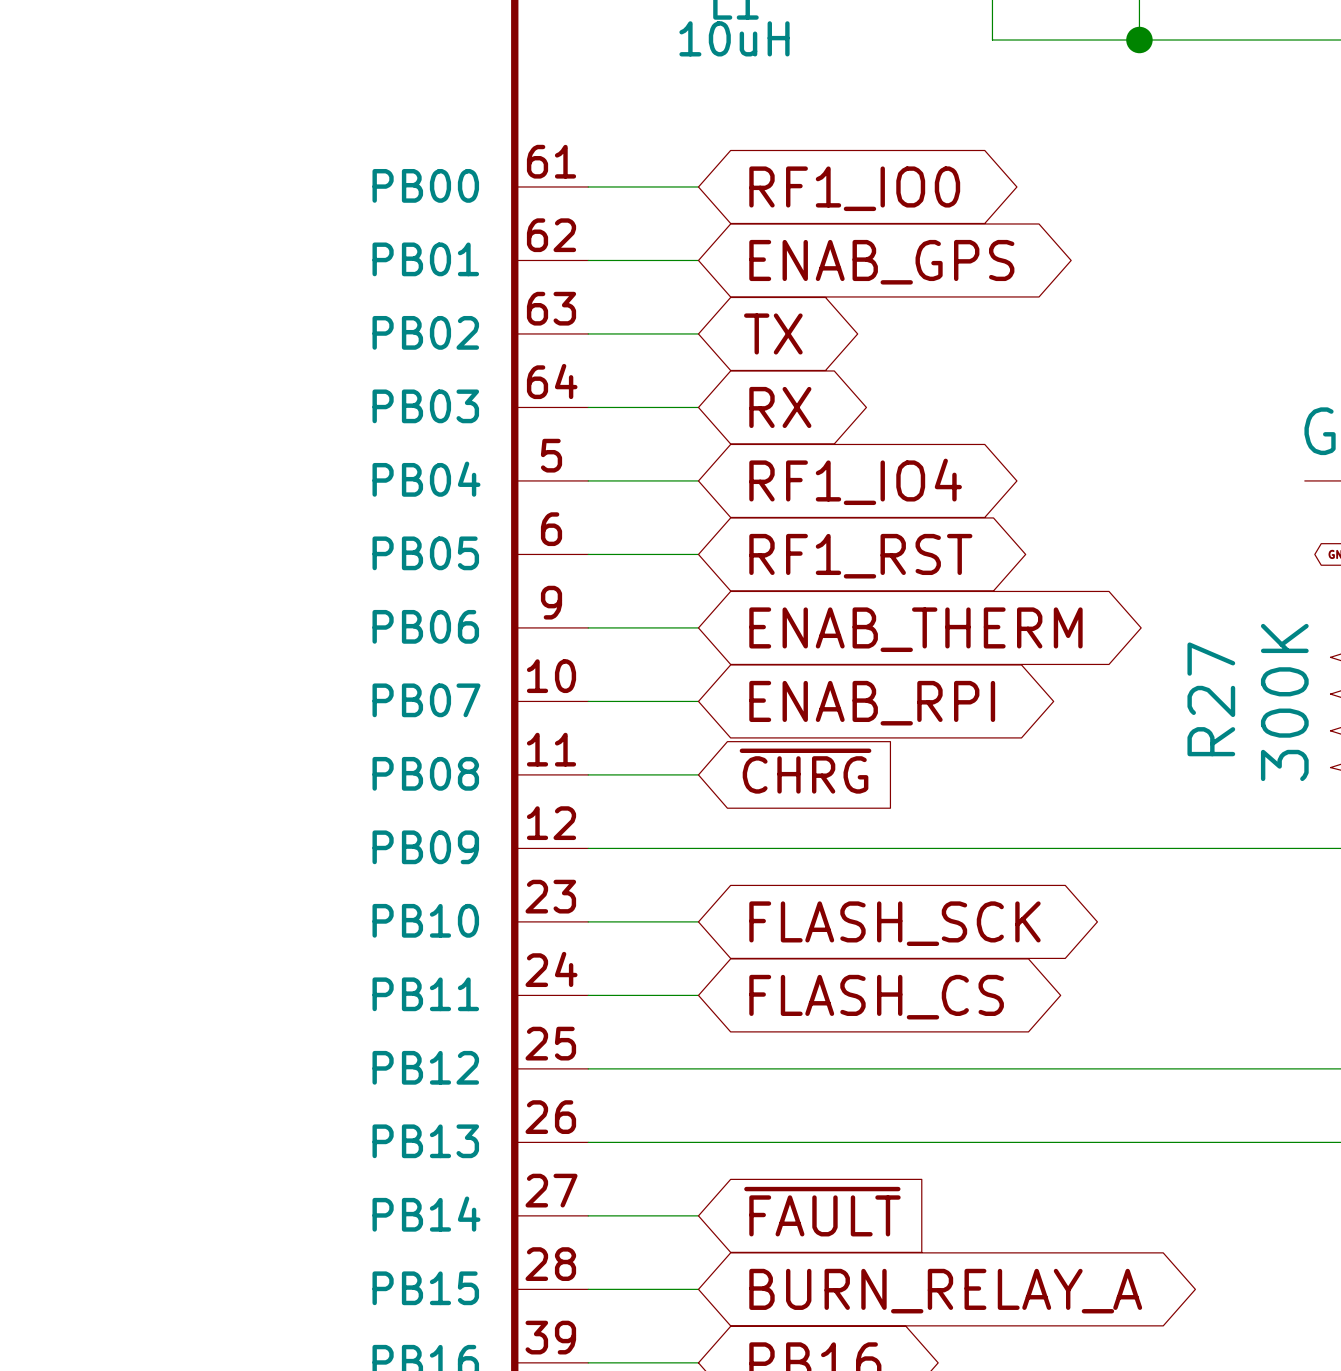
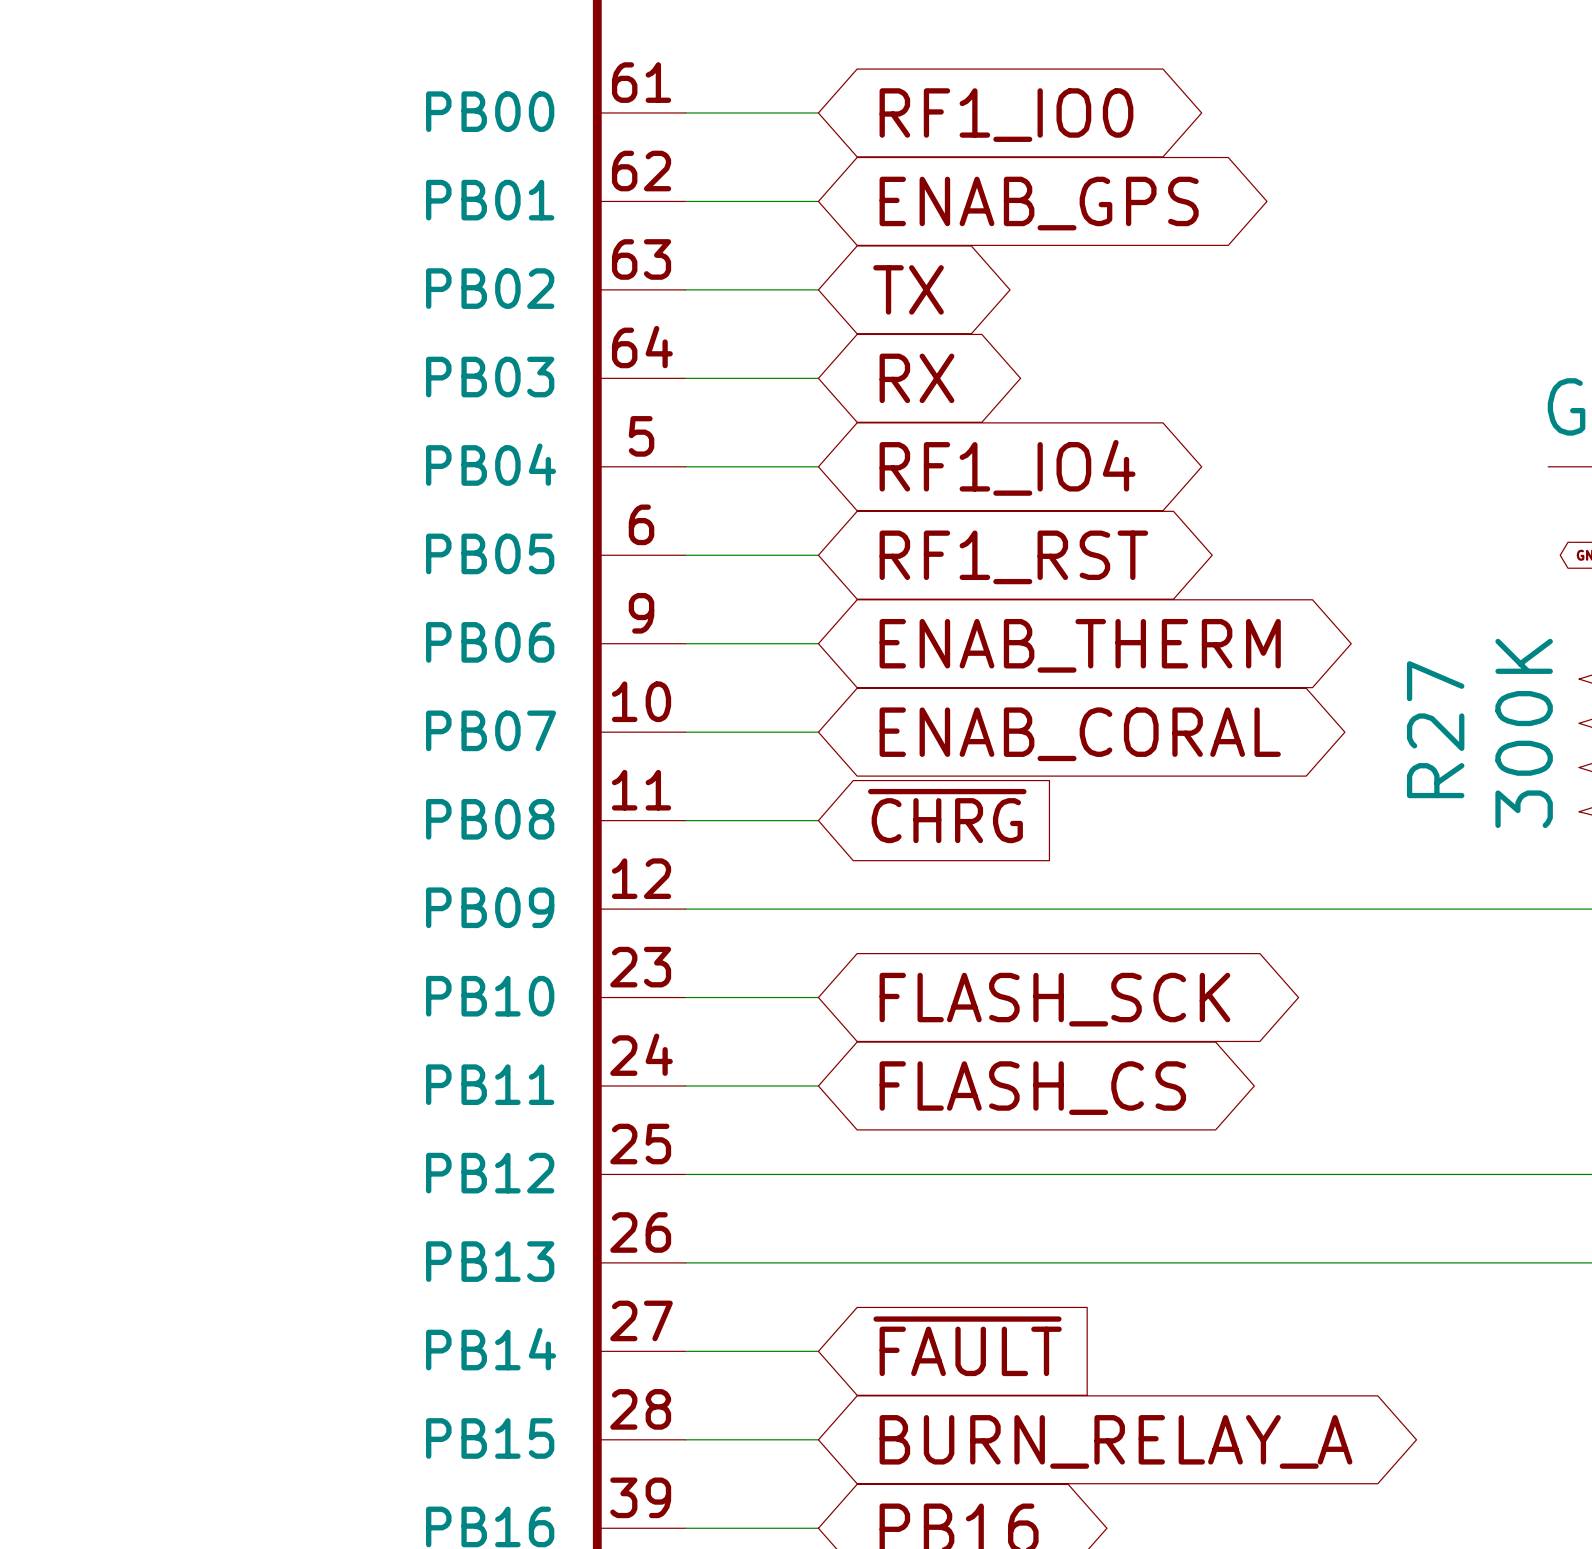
global label: ENAB_RPI (872, 703) -> ENAB_CORAL (1080, 734)

